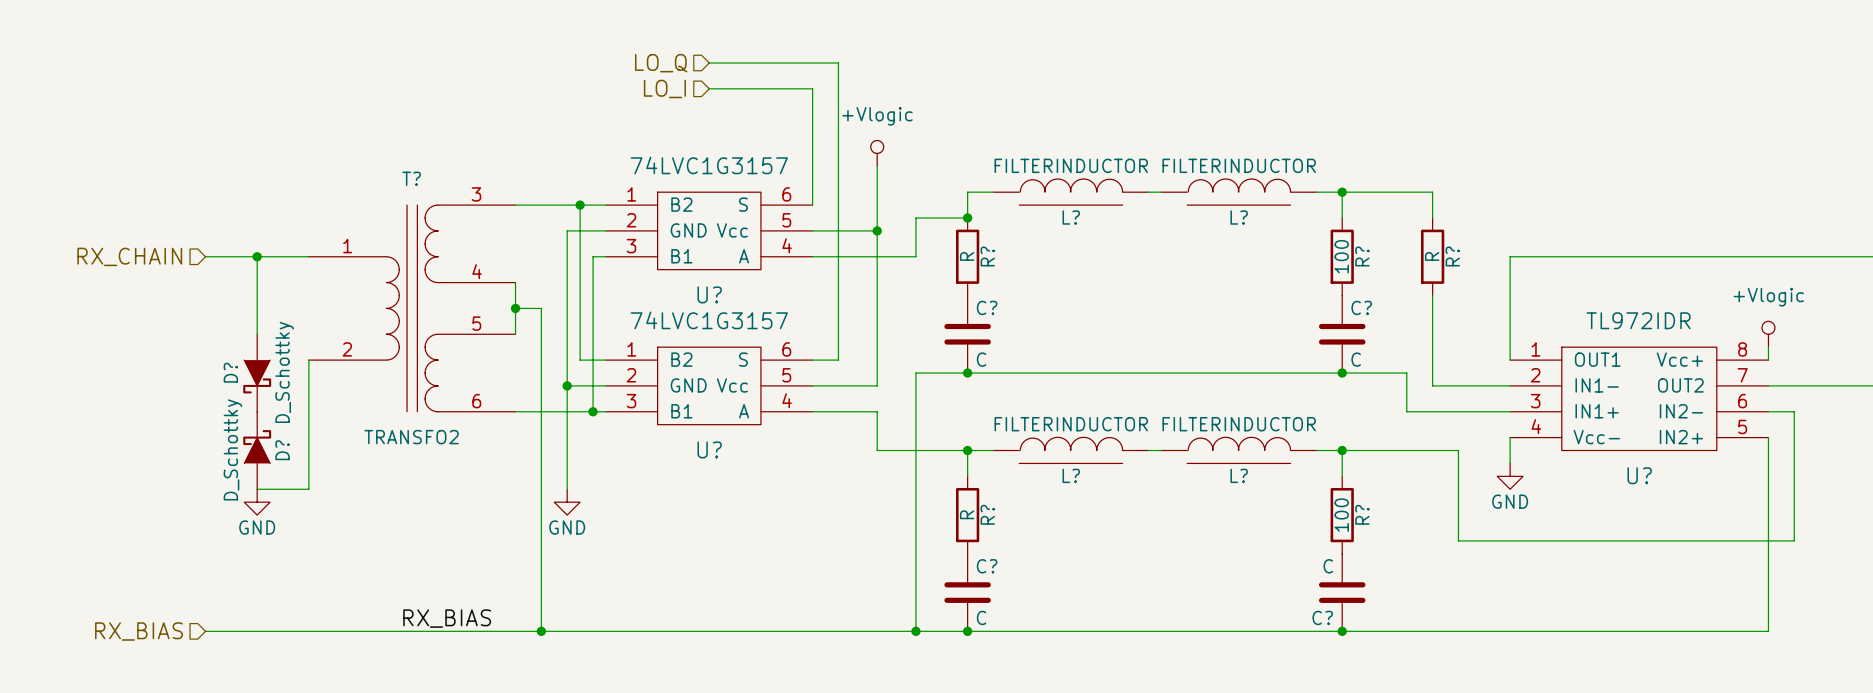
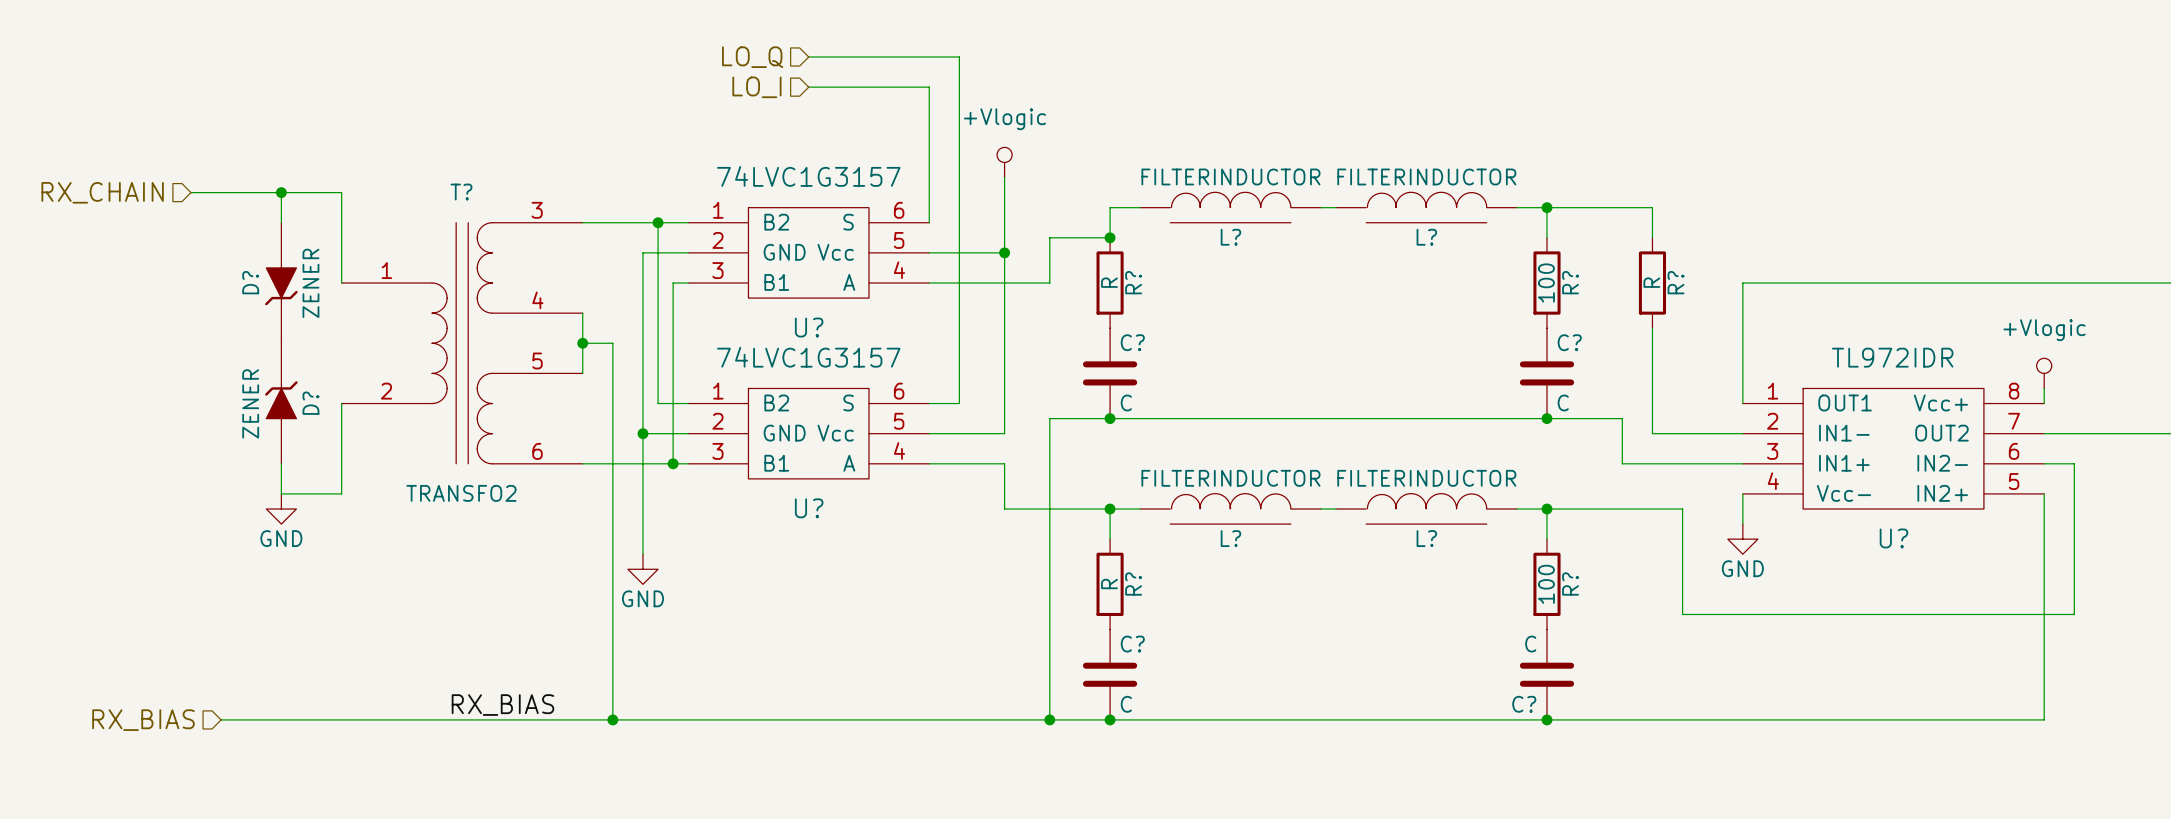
wire: none -> (281, 192) (281, 222)
junction: none -> (281, 192)
hierarchical label position: RX_CHAIN (129, 256) -> RX_CHAIN (102, 192)
wire: (205, 256) (308, 256) -> (190, 192) (341, 192) (341, 283)
D?: none -> ZENER (281, 283)
junction: (257, 256) -> none
D?: none -> ZENER (281, 403)
D?: D_Schottky (257, 373) -> none
wire: (308, 437) (308, 489) (257, 489) -> (341, 493) (281, 493) (281, 463)
D?: D_Schottky (257, 450) -> none
power symbol position: GND (257, 502) -> GND (281, 509)

